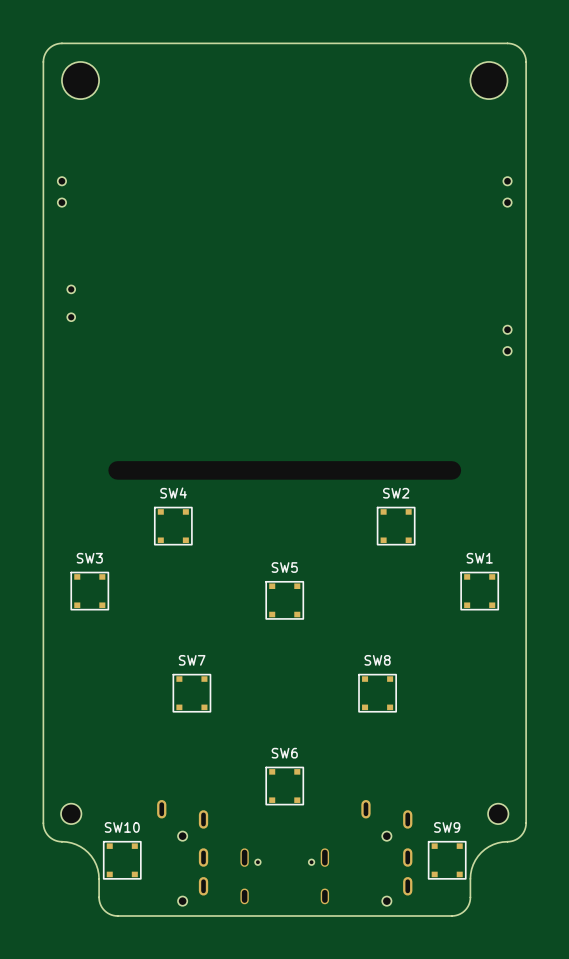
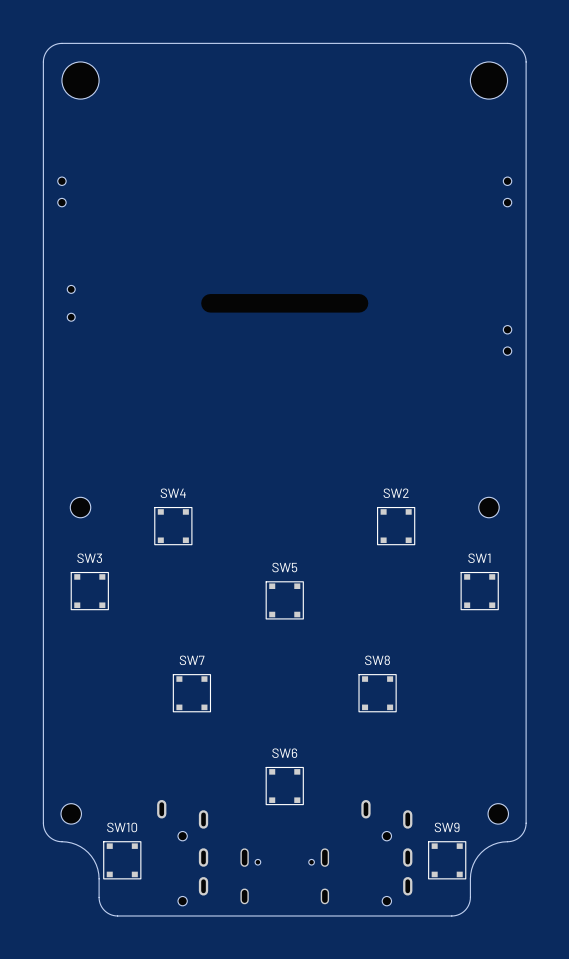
part: none -> (284, 303)
part: (284, 470) -> none
part: none -> (80, 507)
part: none -> (488, 507)

